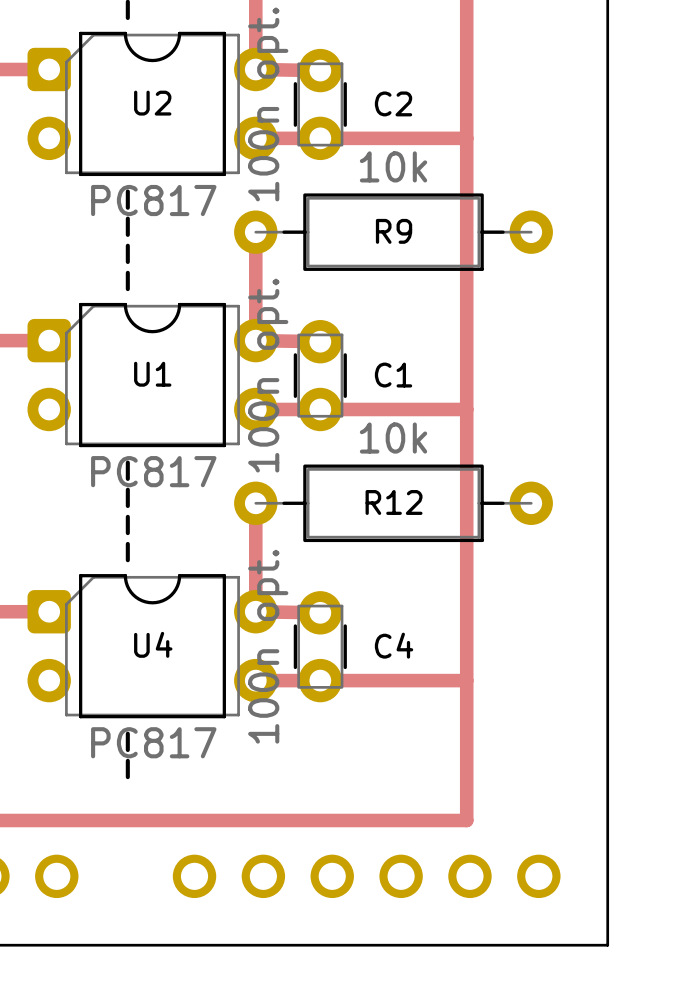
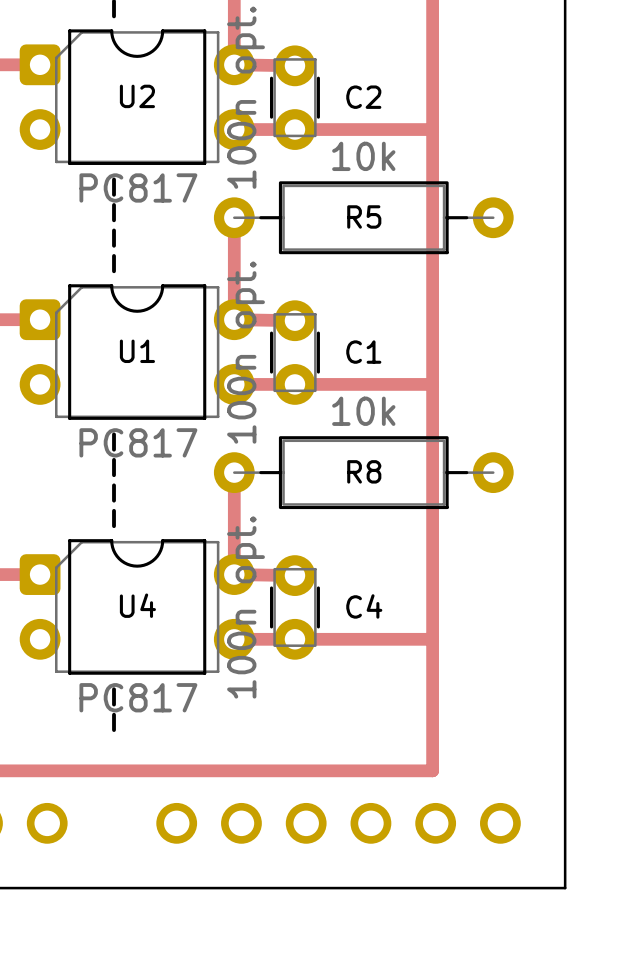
R9 name: R9 (394, 231) -> R5 (364, 216)
R12 name: R12 (394, 502) -> R8 (364, 471)

